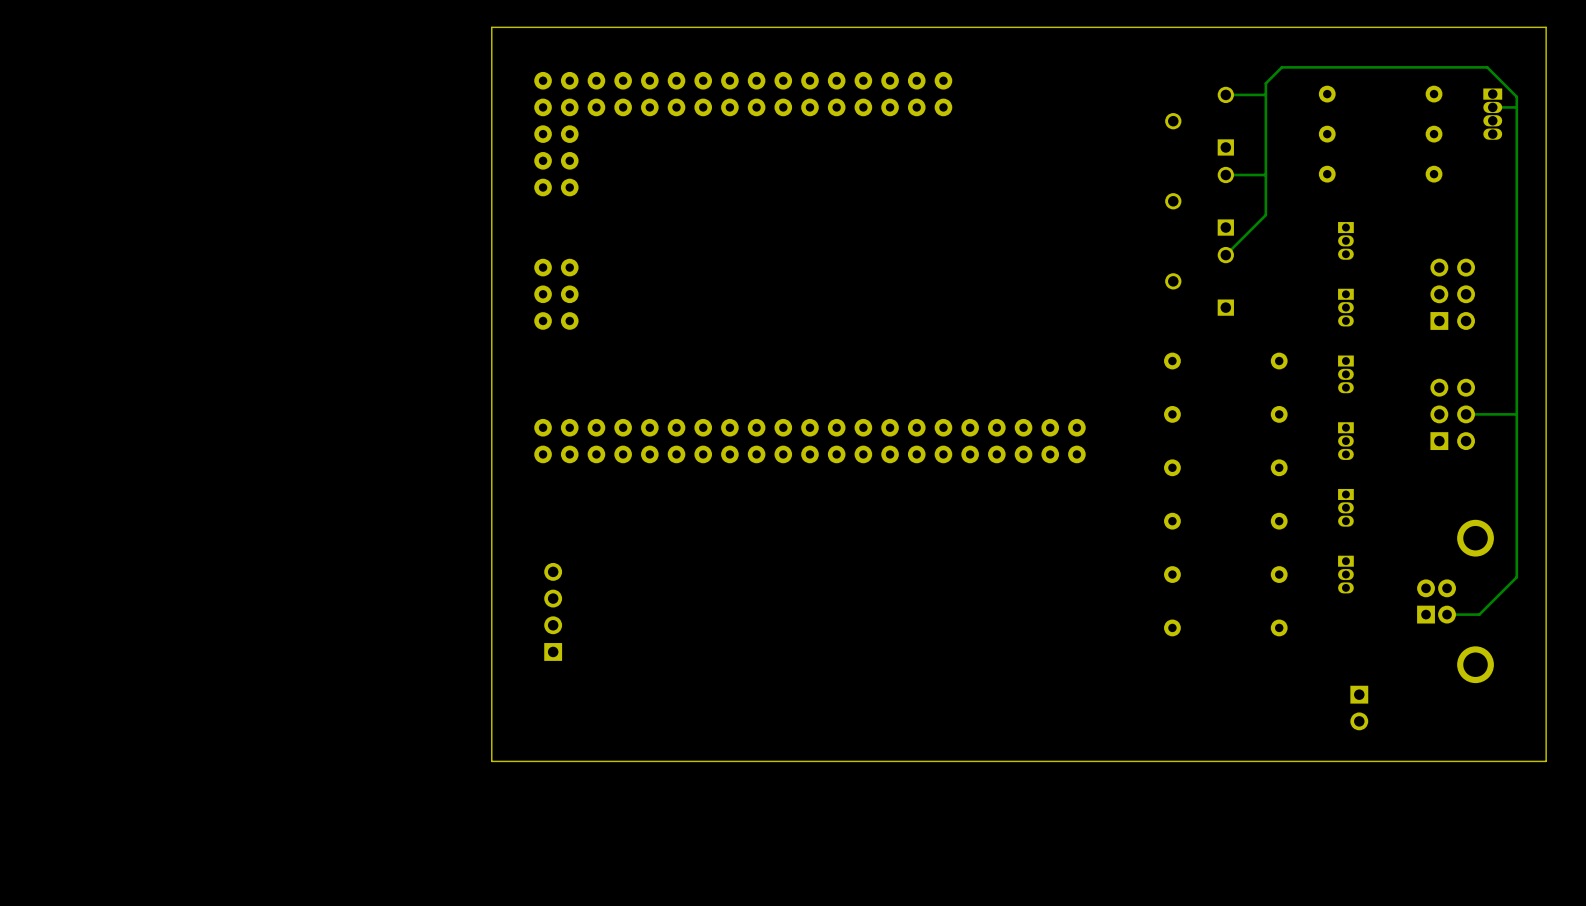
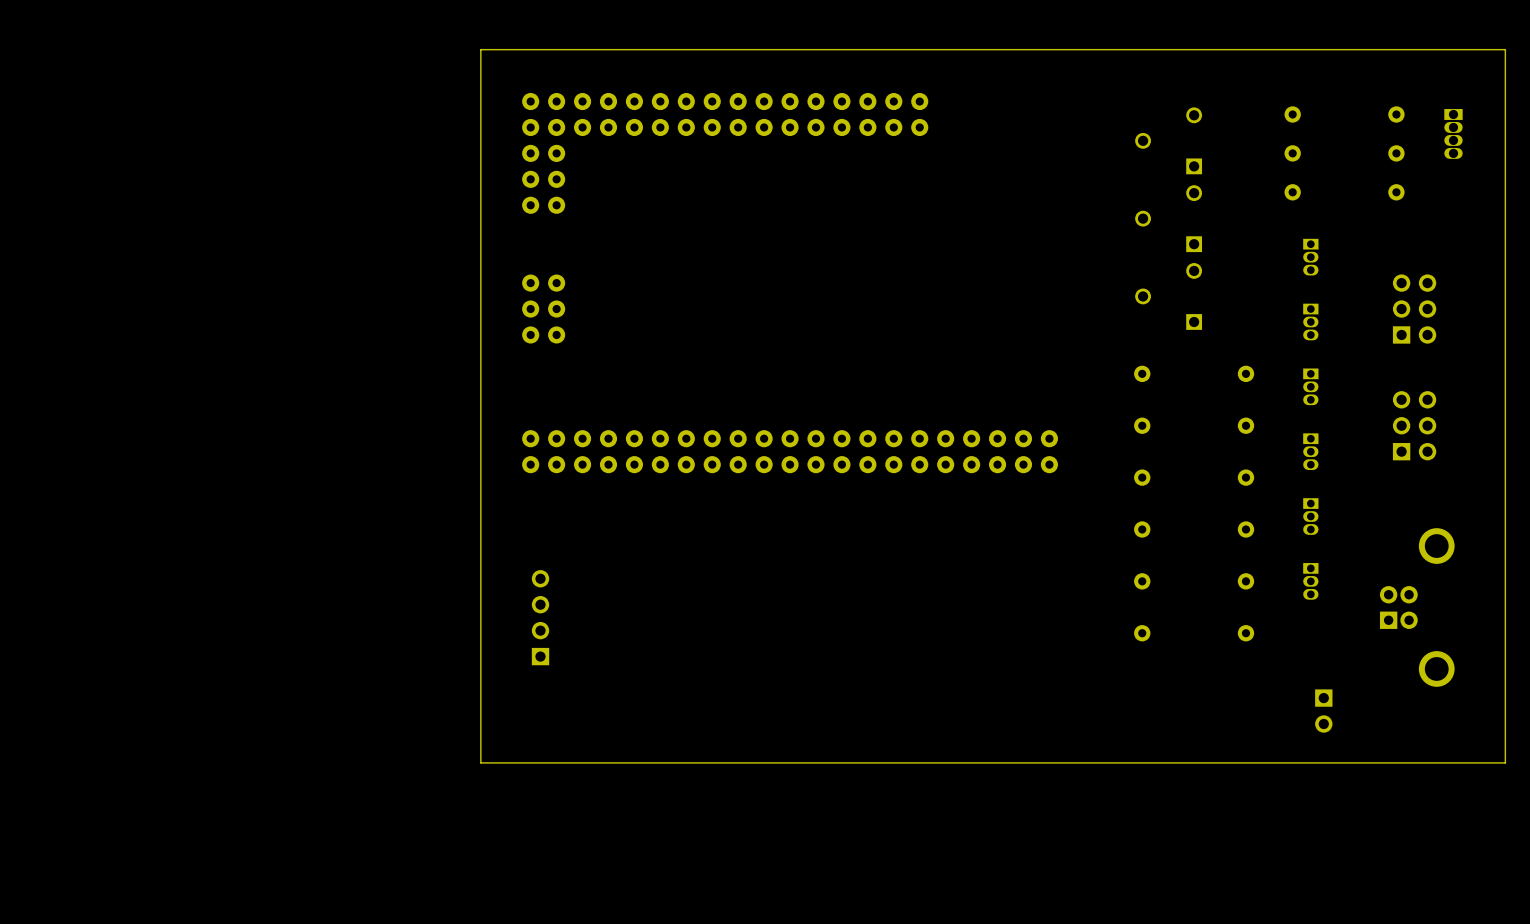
track: (1265, 94) (1225, 94) -> none
track: (1516, 107) (1492, 107) -> none
track: (1265, 174) (1225, 175) -> none
track: (1225, 255) (1265, 215) (1265, 83) (1281, 67) (1487, 67) (1516, 96) (1516, 577) (1479, 614) (1447, 614) -> none
track: (1516, 414) (1466, 414) -> none

